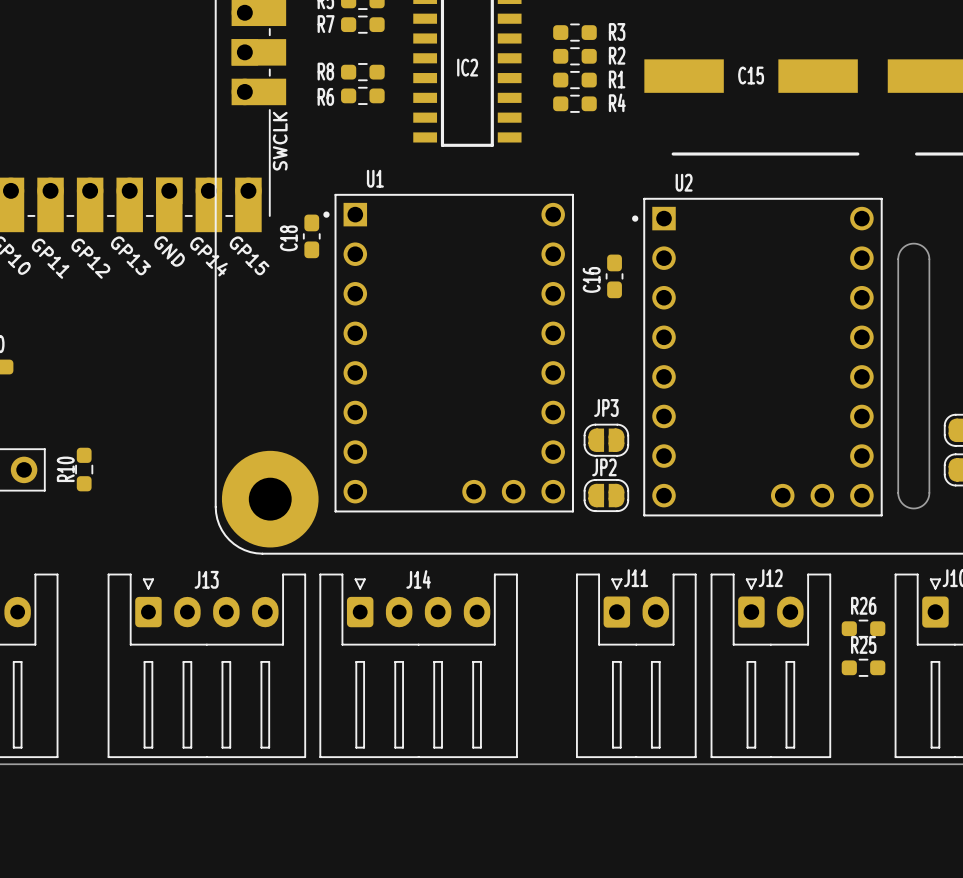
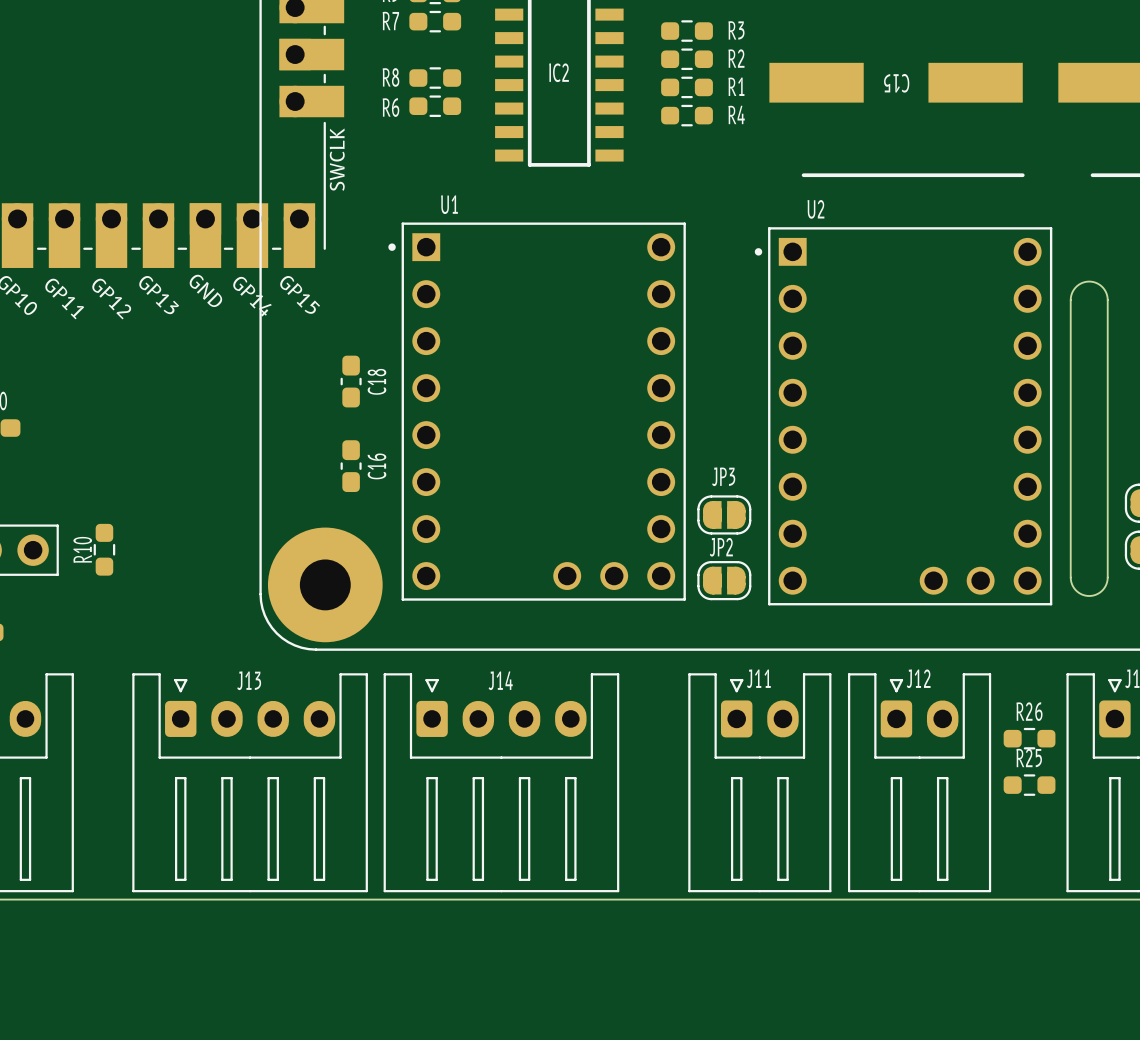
C15 name rotation: 0° (751, 75) -> 180° (896, 83)
C18 position: (311, 236) -> (351, 381)
C18 name position: C18 (288, 238) -> C18 (376, 381)
C16 position: (614, 276) -> (351, 466)
C16 name position: C16 (591, 279) -> C16 (376, 466)

